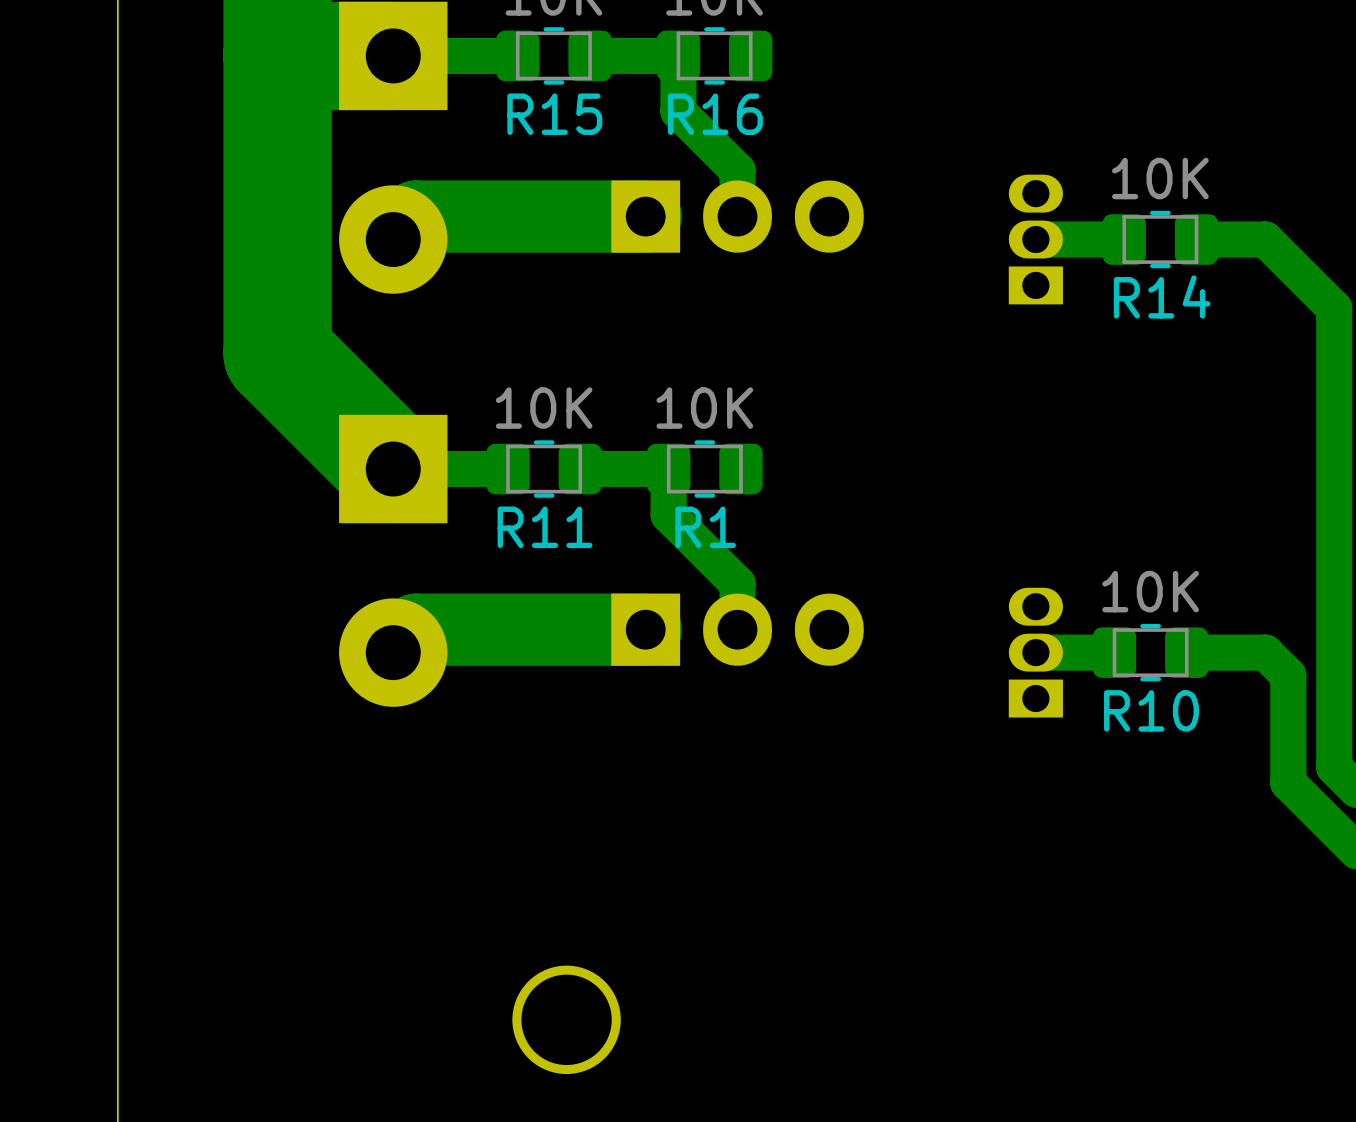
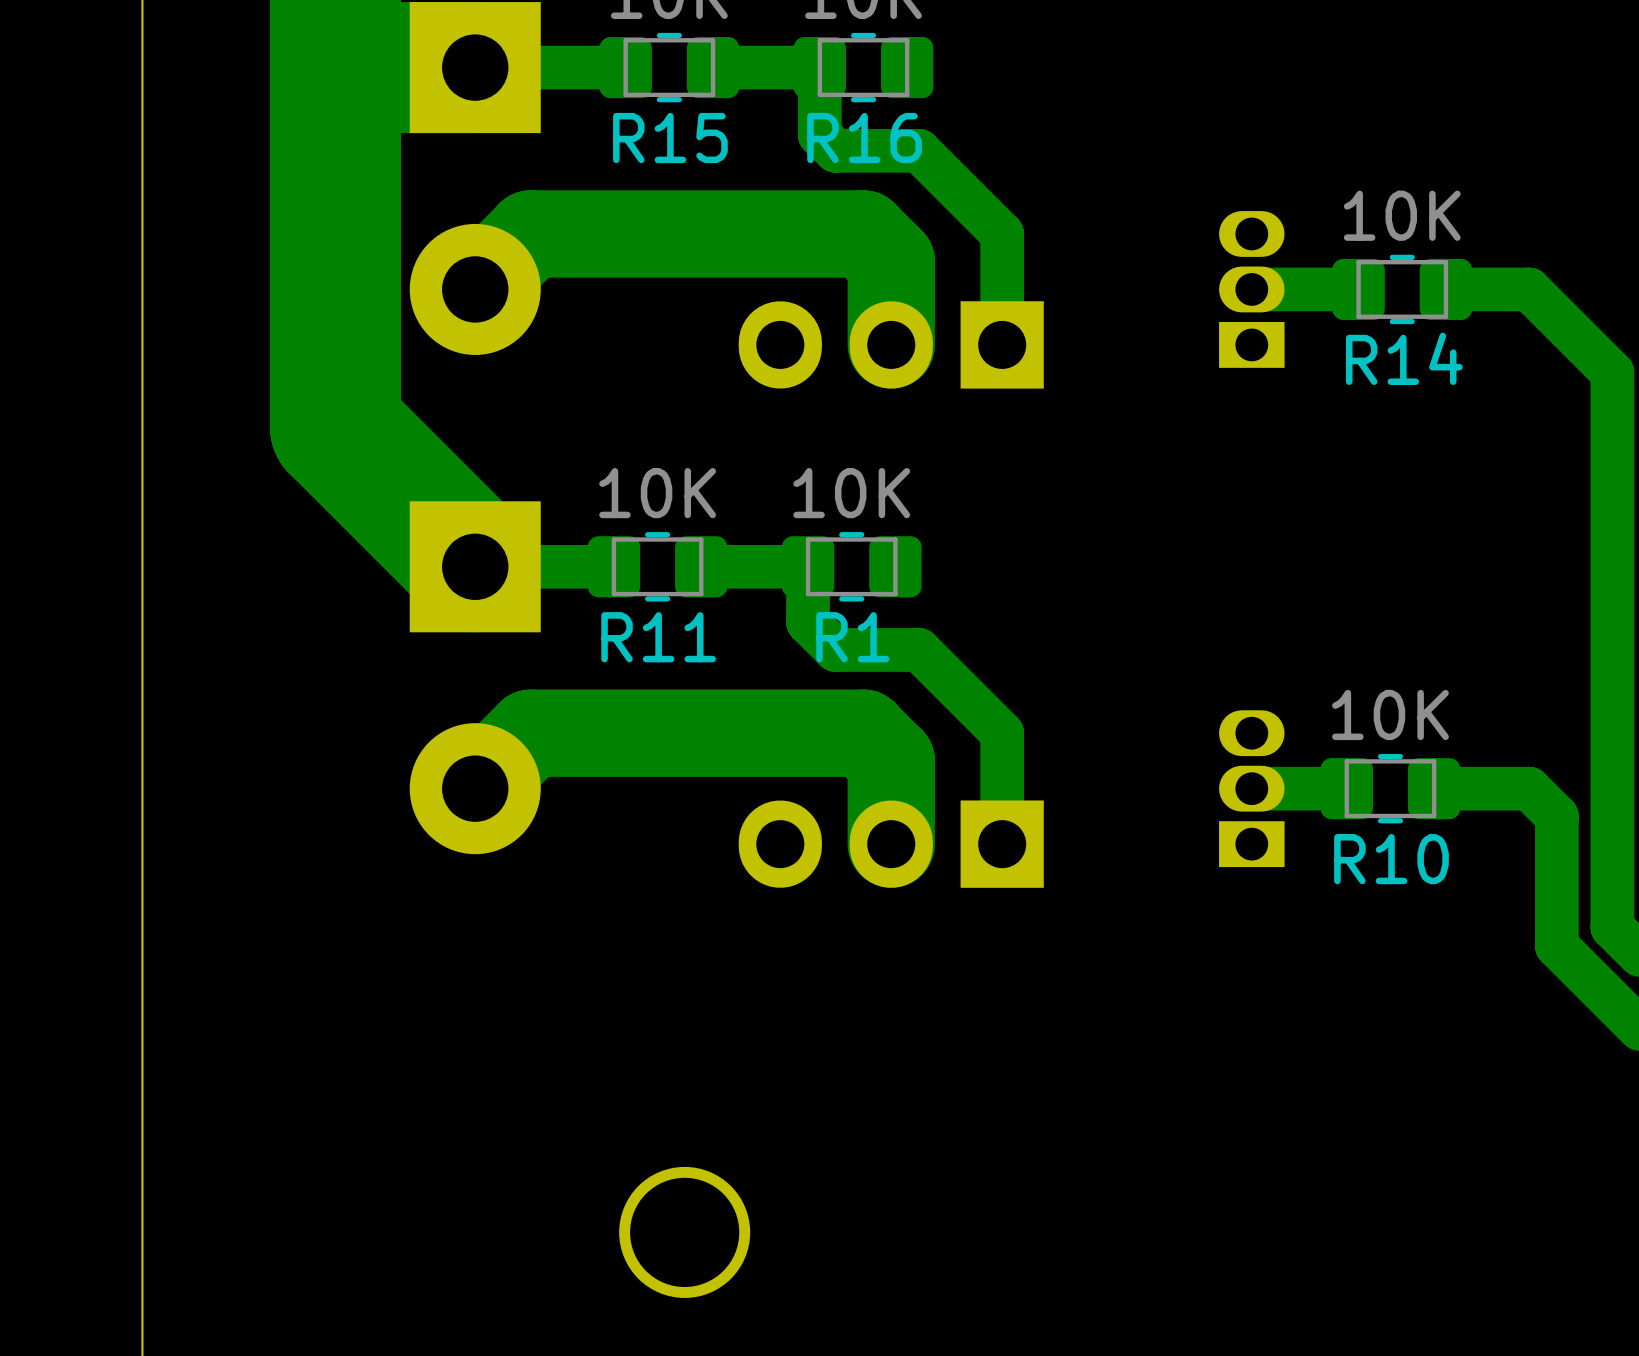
track: (691, 124) (737, 170) (737, 216) -> (835, 150) (918, 150) (1002, 233) (1002, 344)
track: (645, 216) (416, 216) -> (891, 344) (891, 261) (863, 233) (530, 233) (502, 261)
part rotation: 0° (737, 216) -> 180° (891, 344)
track: (691, 537) (737, 583) (737, 629) -> (835, 650) (918, 650) (1002, 733) (1002, 844)
track: (645, 629) (416, 629) -> (891, 844) (891, 760) (863, 733) (530, 733) (502, 760)
part rotation: 0° (737, 629) -> 180° (891, 844)

